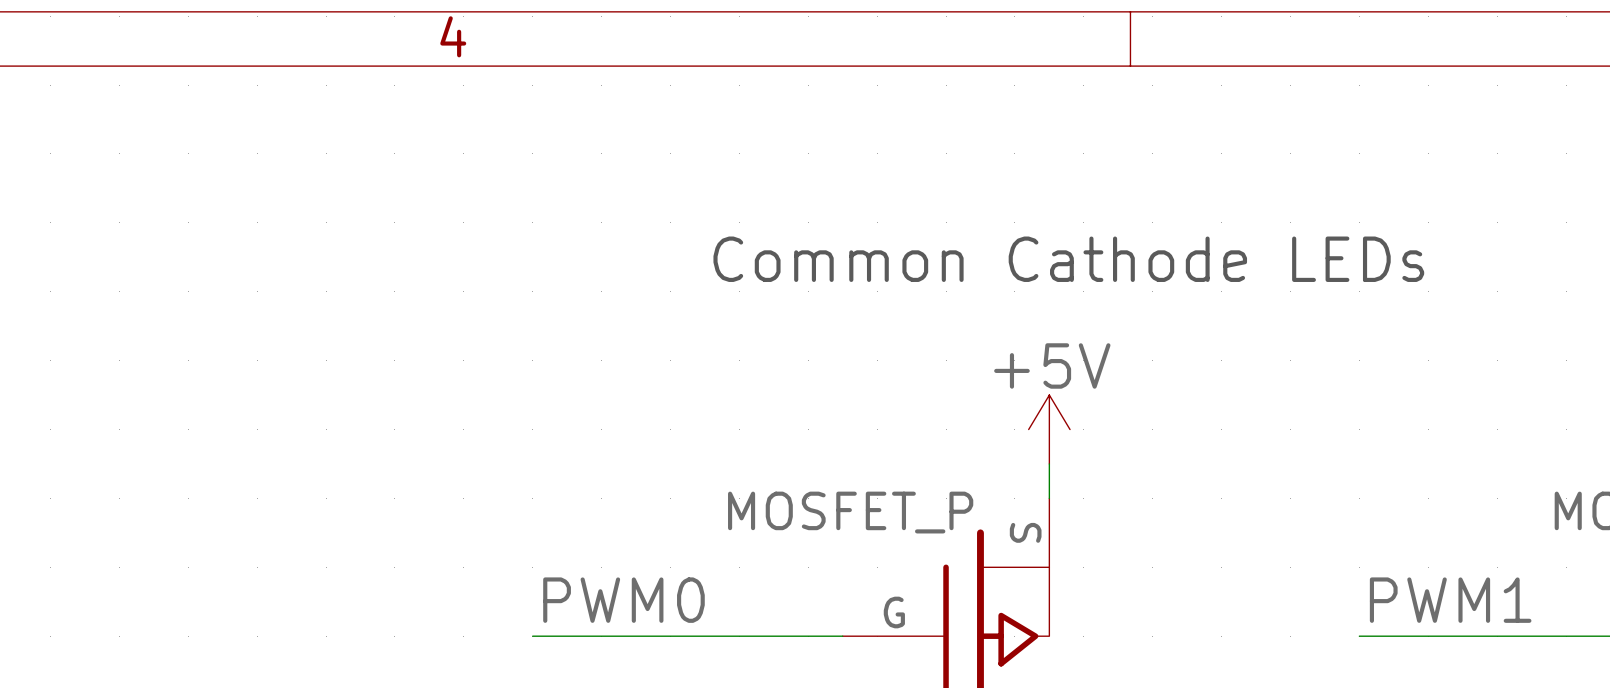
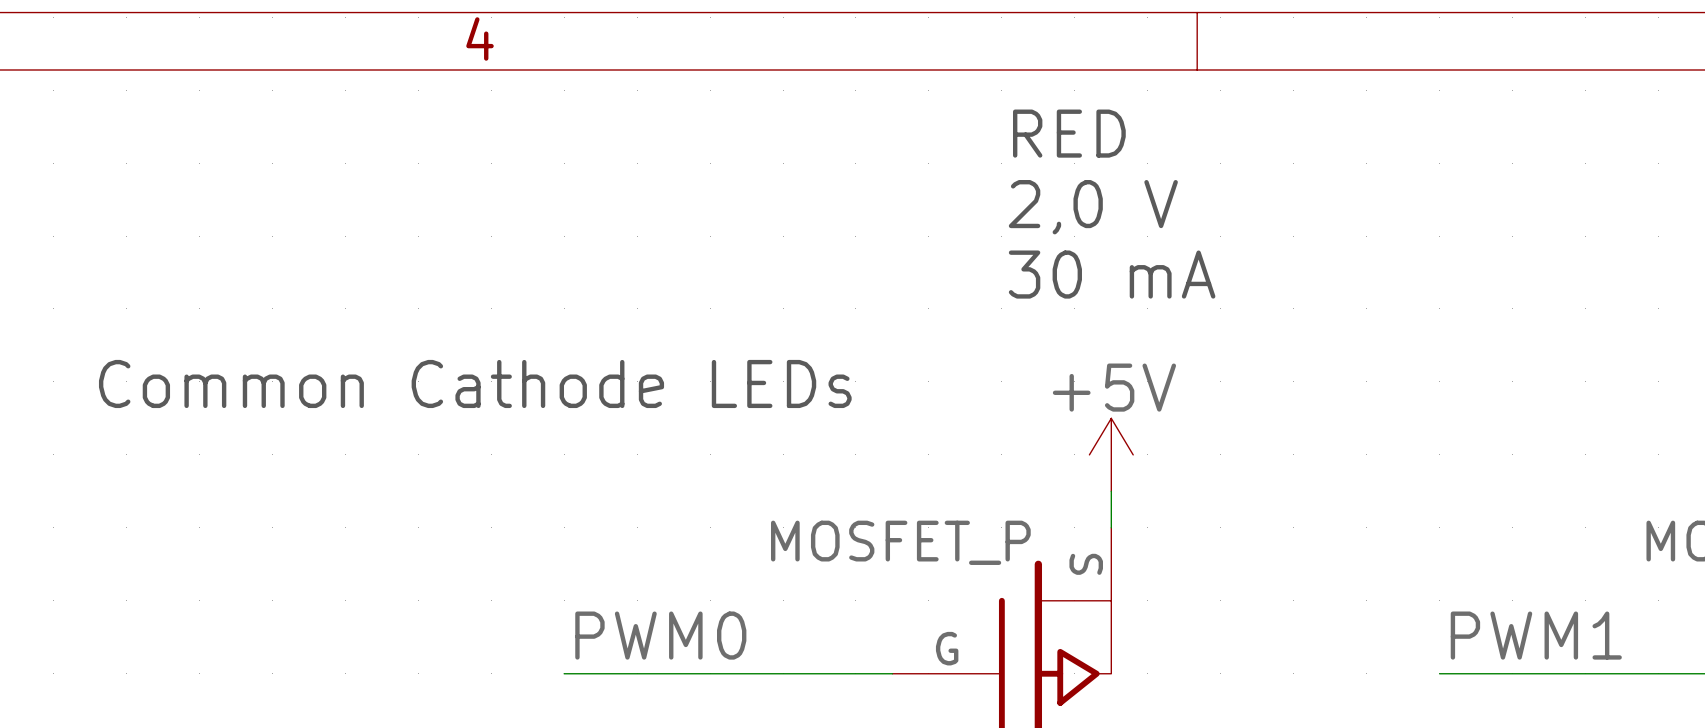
text: none -> RED (1069, 133)
text: none -> 2,0 V (1093, 207)
text: none -> 30 mA (1112, 274)
text position: Common Cathode LEDs (1068, 259) -> Common Cathode LEDs (475, 383)

